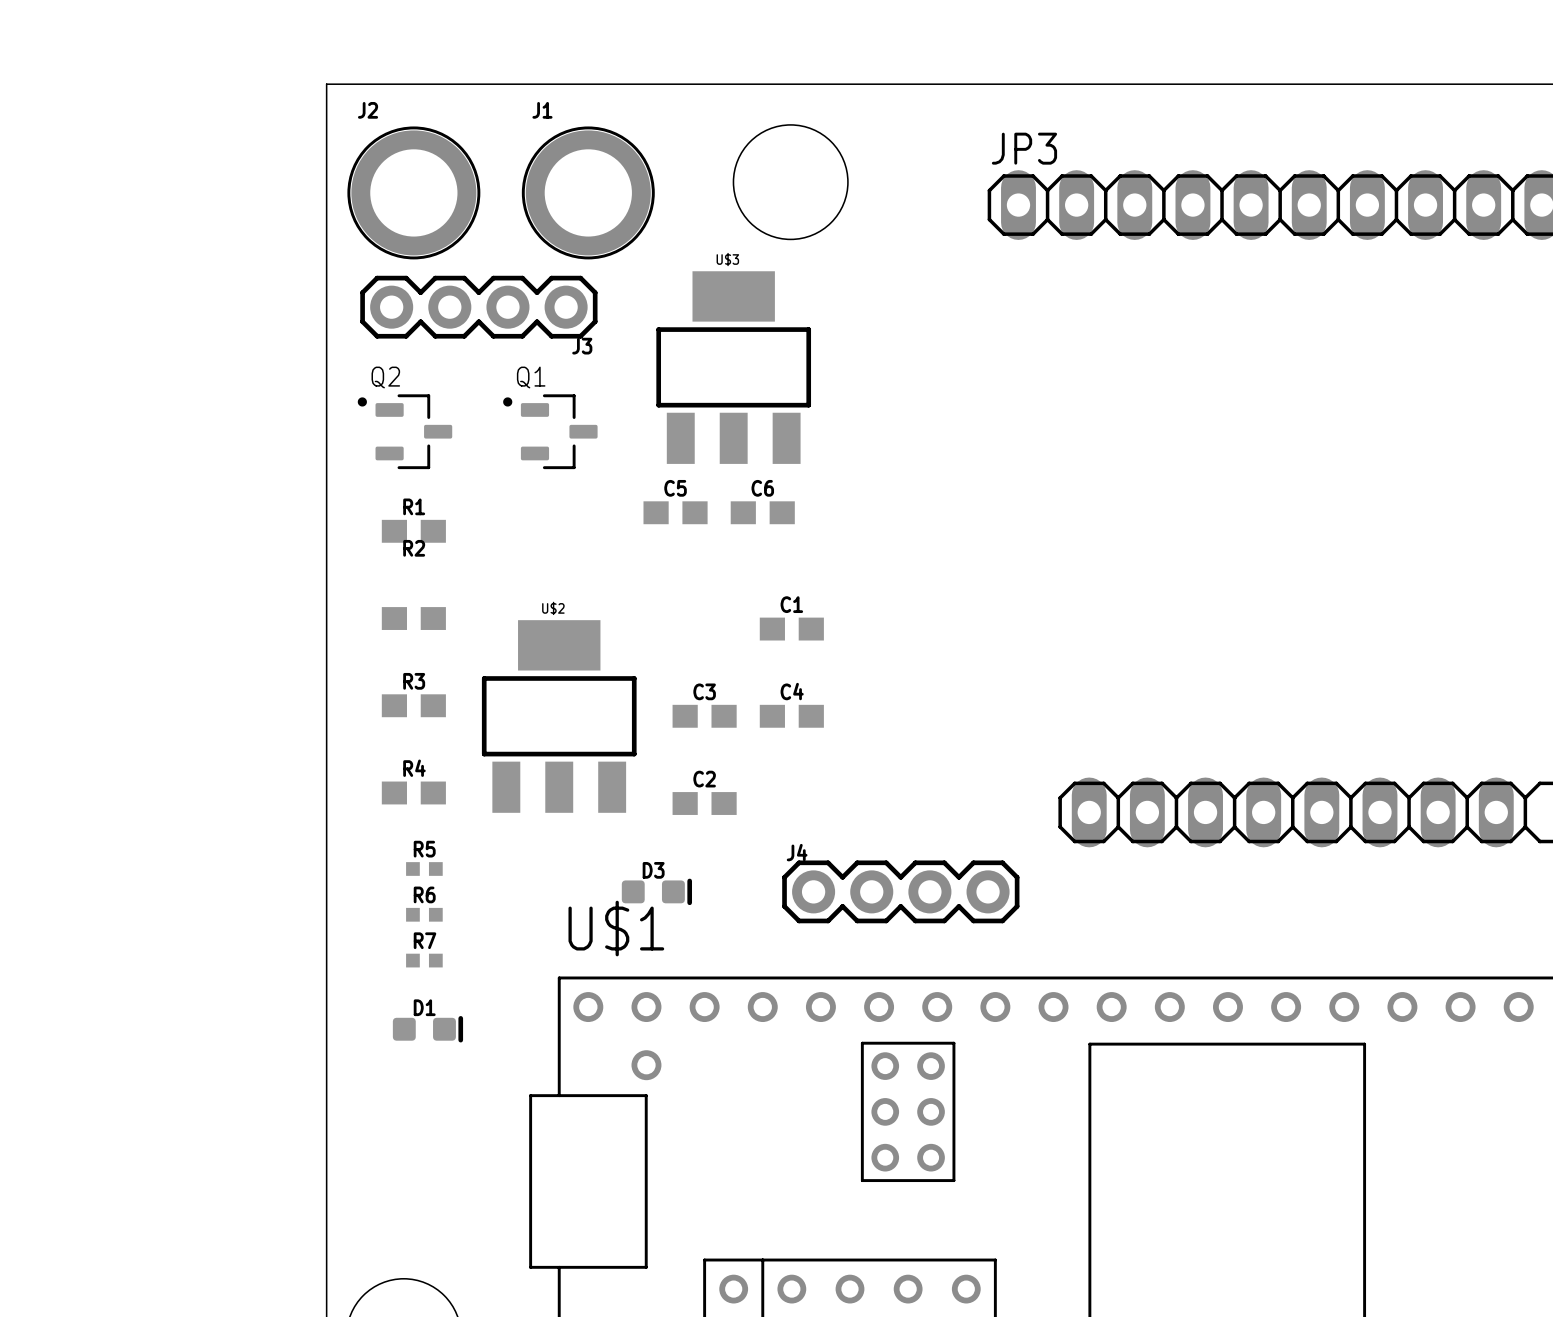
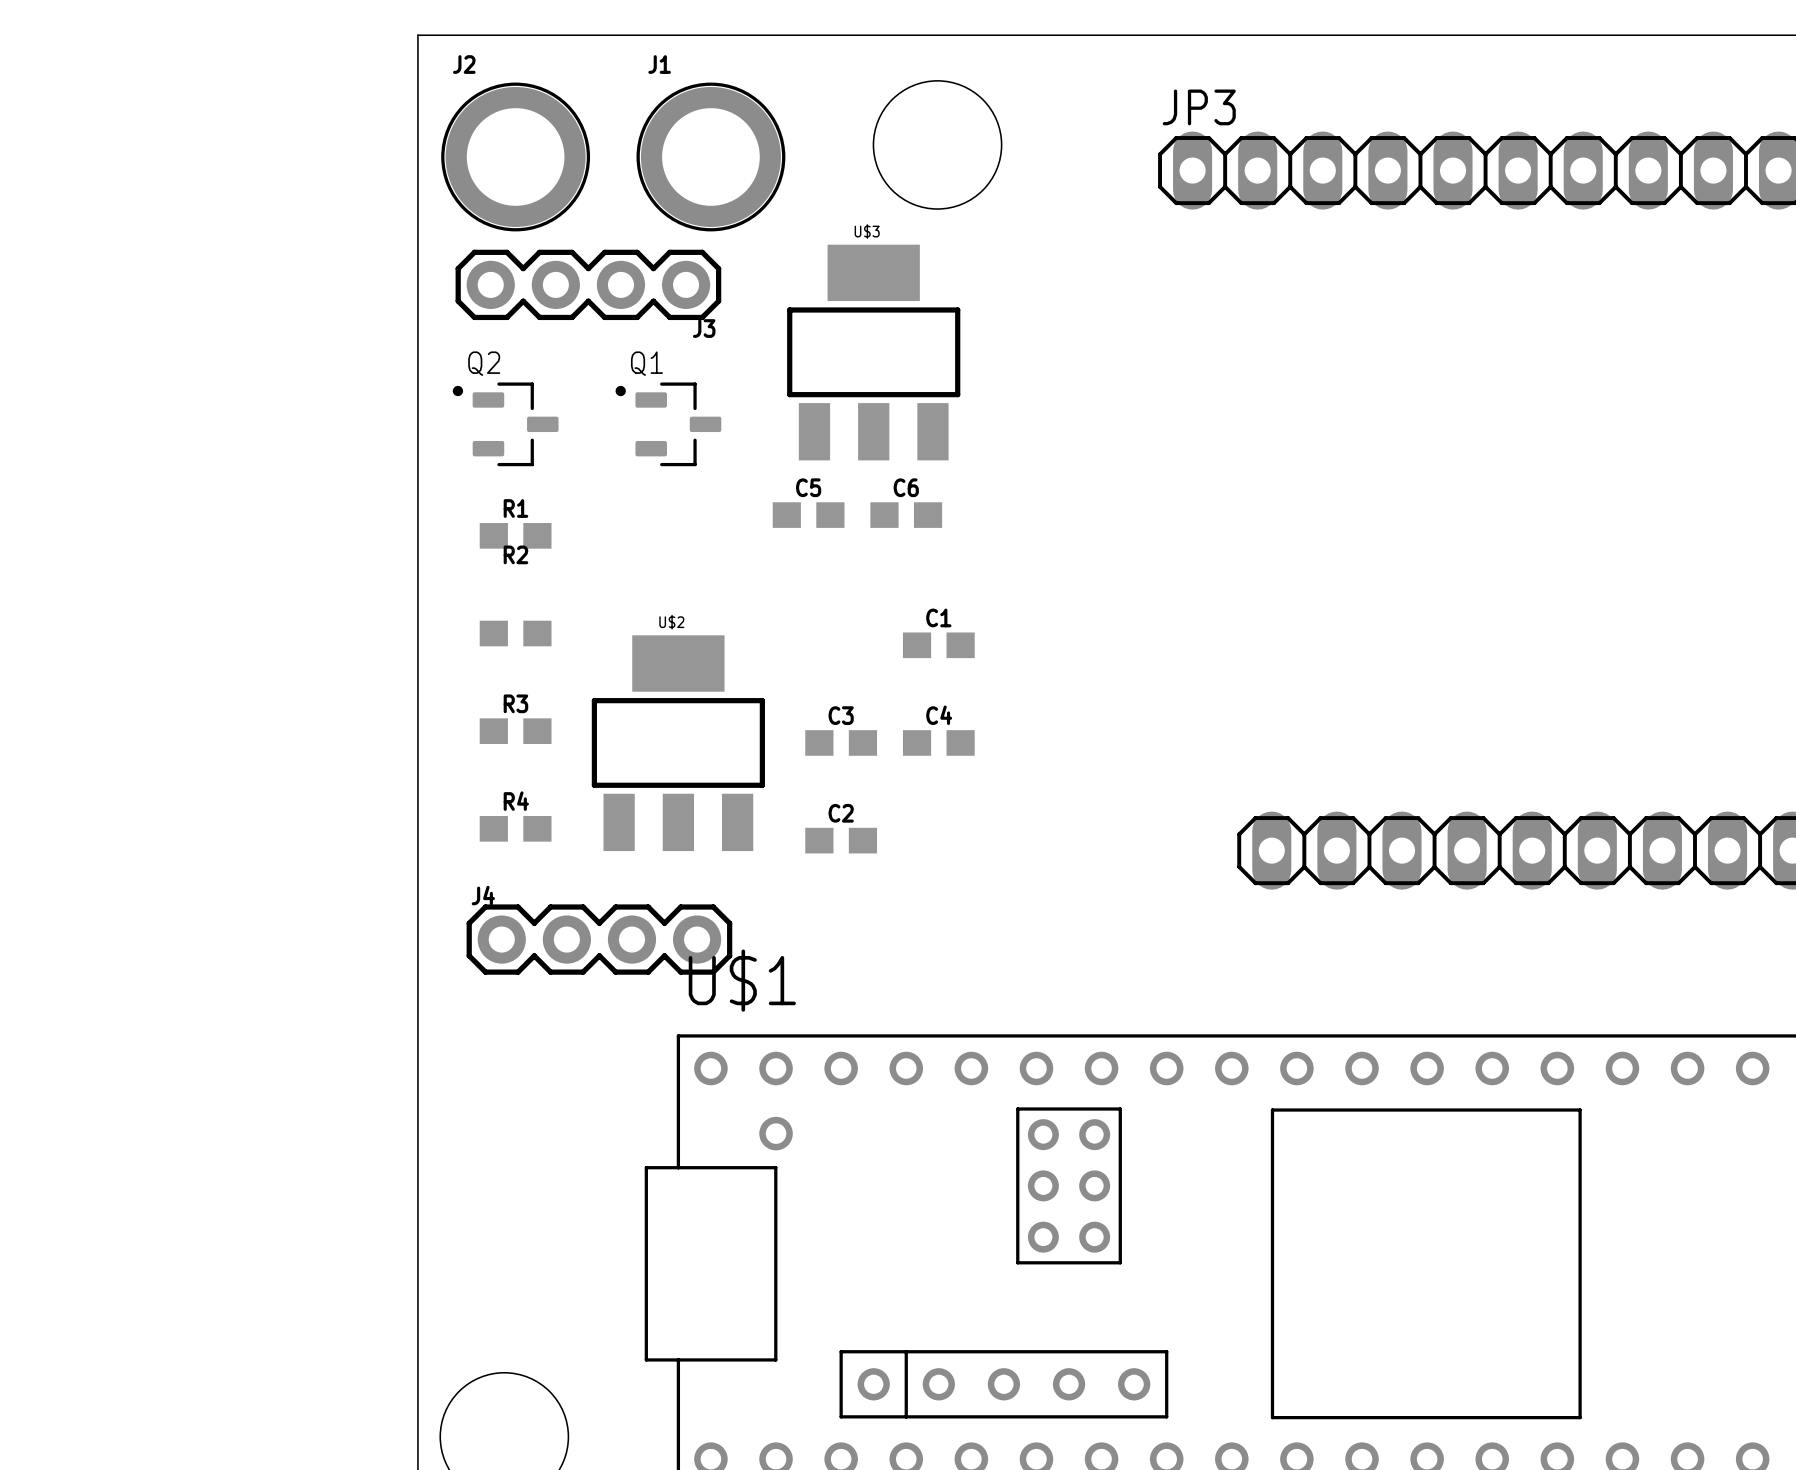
R5: (424, 868) -> none
D3: (656, 891) -> none
J4 position: (900, 891) -> (599, 939)
R6: (424, 914) -> none
R7: (424, 960) -> none
D1: (427, 1029) -> none

